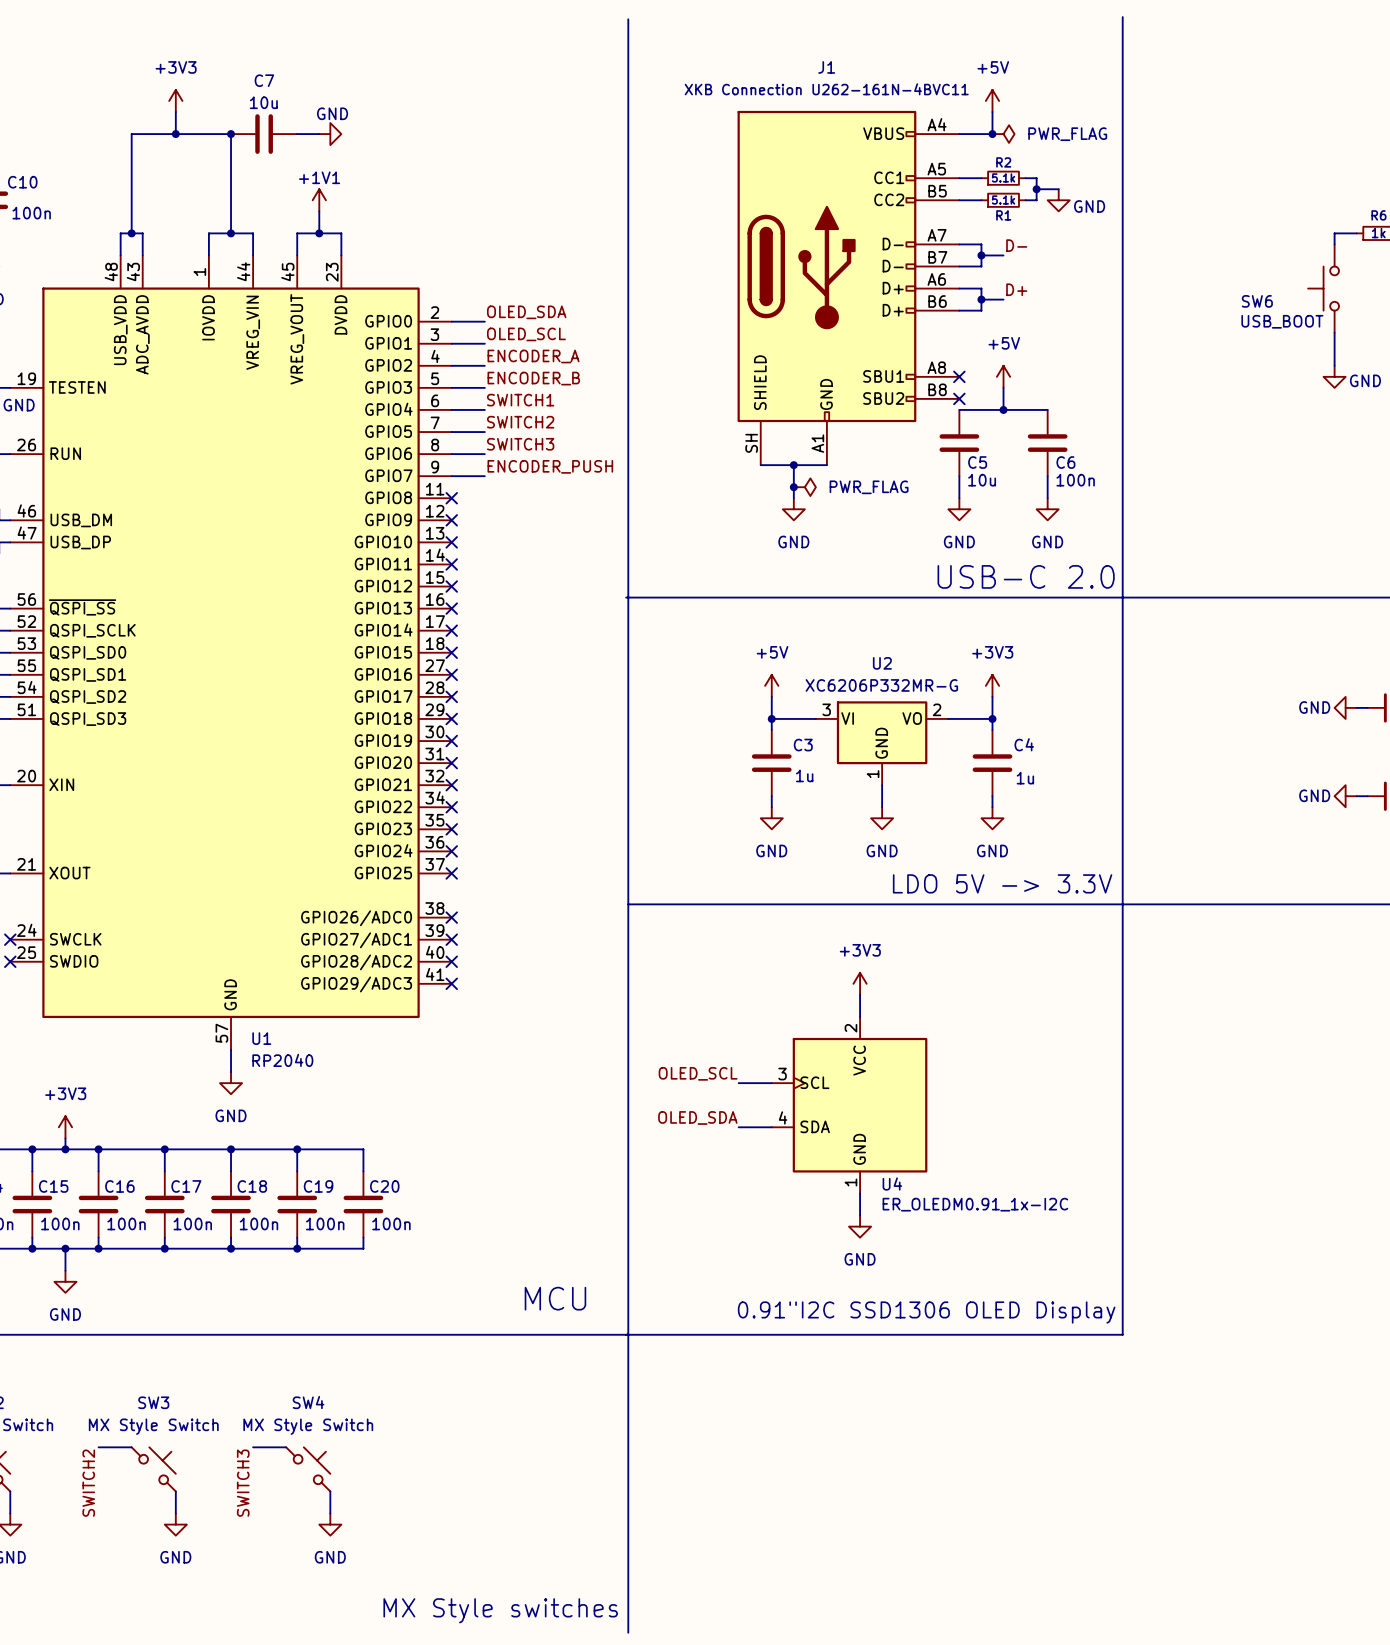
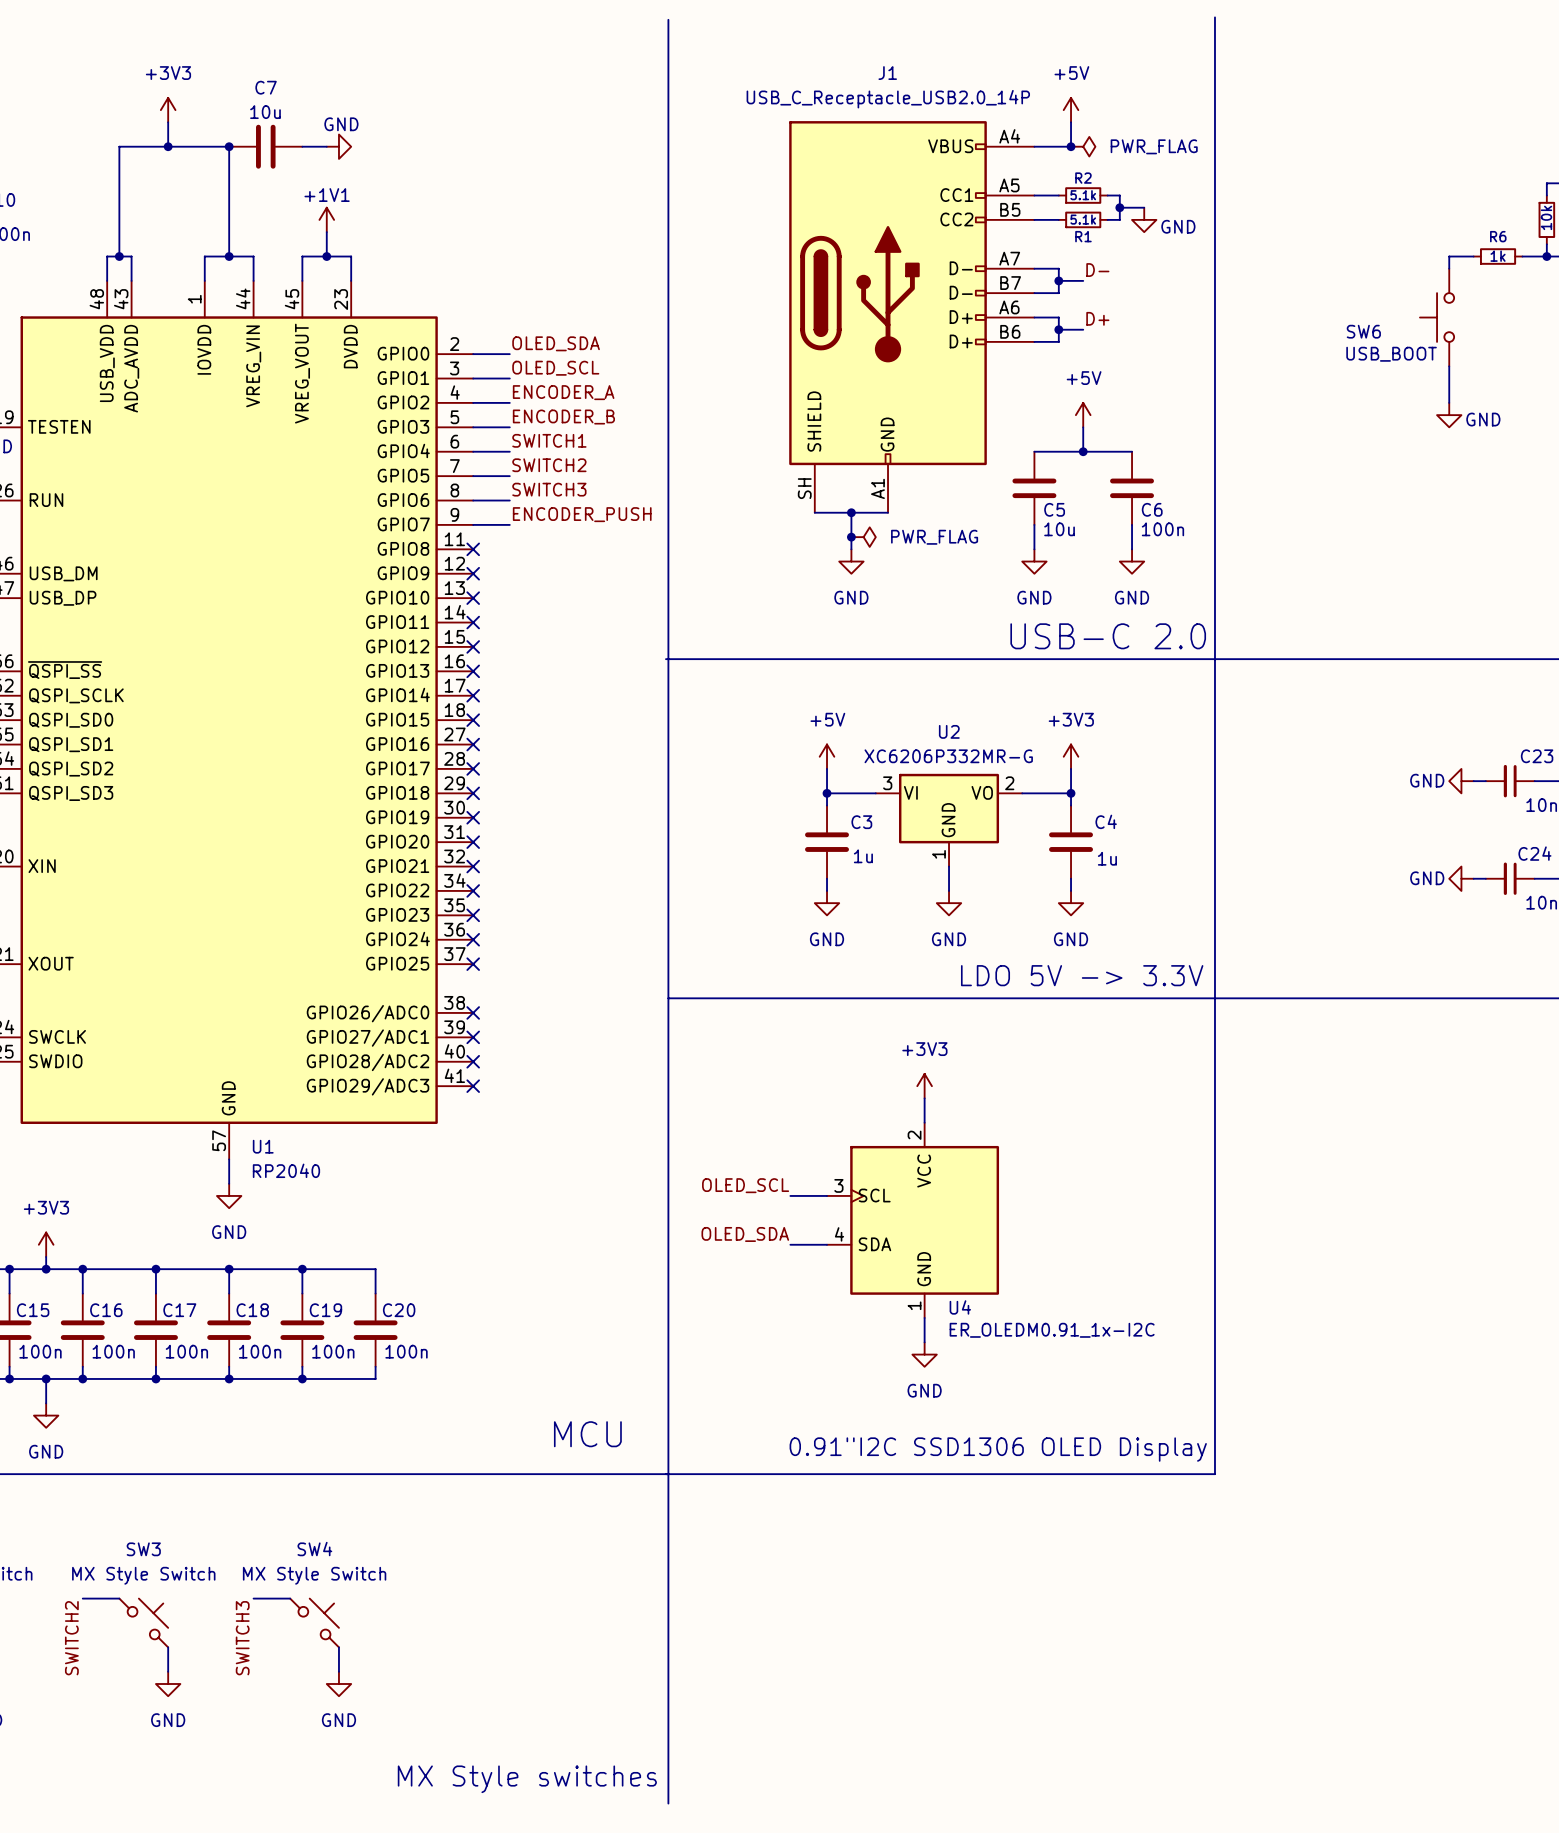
J1 value: XKB Connection U262-161N-4BVC11 (826, 89) -> USB_C_Receptacle_USB2.0_14P (888, 99)
J1 symbol: [737, 110, 960, 466] -> [789, 121, 1035, 513]
no-connect mark: (959, 376) -> none
no-connect mark: (959, 398) -> none

